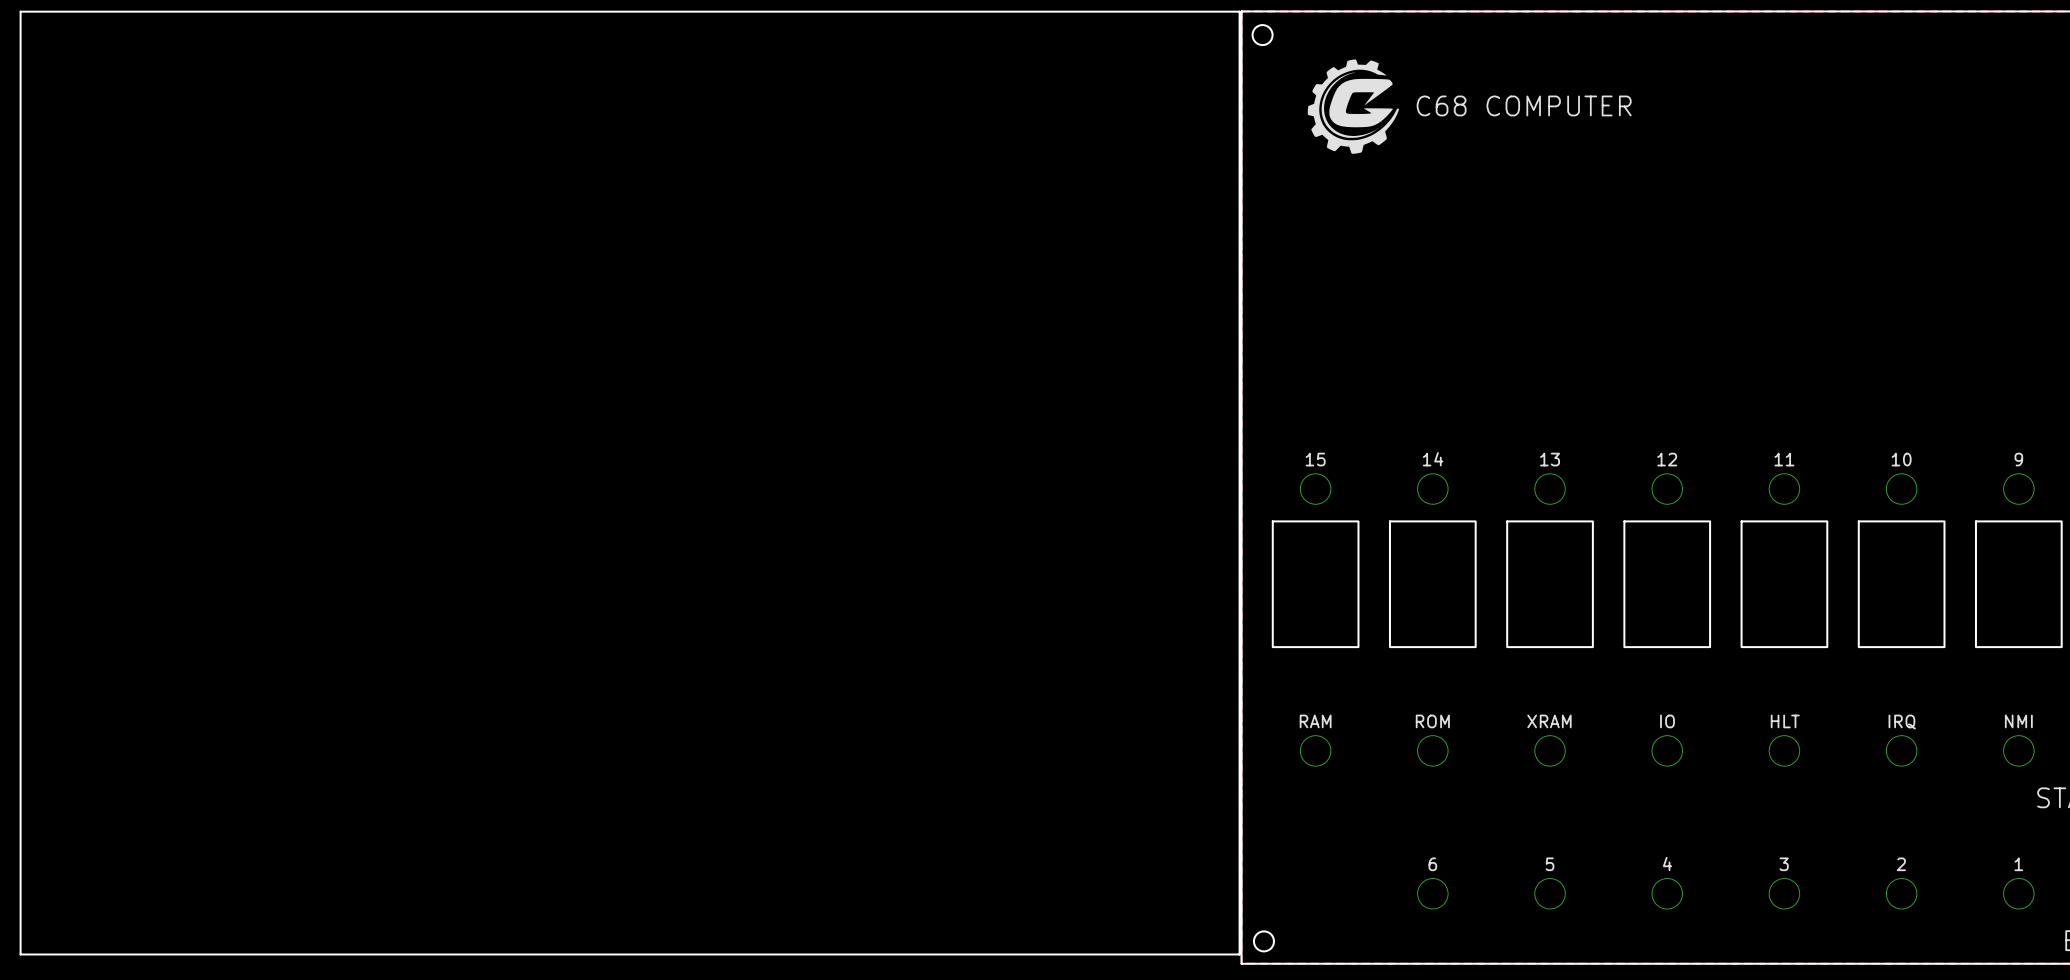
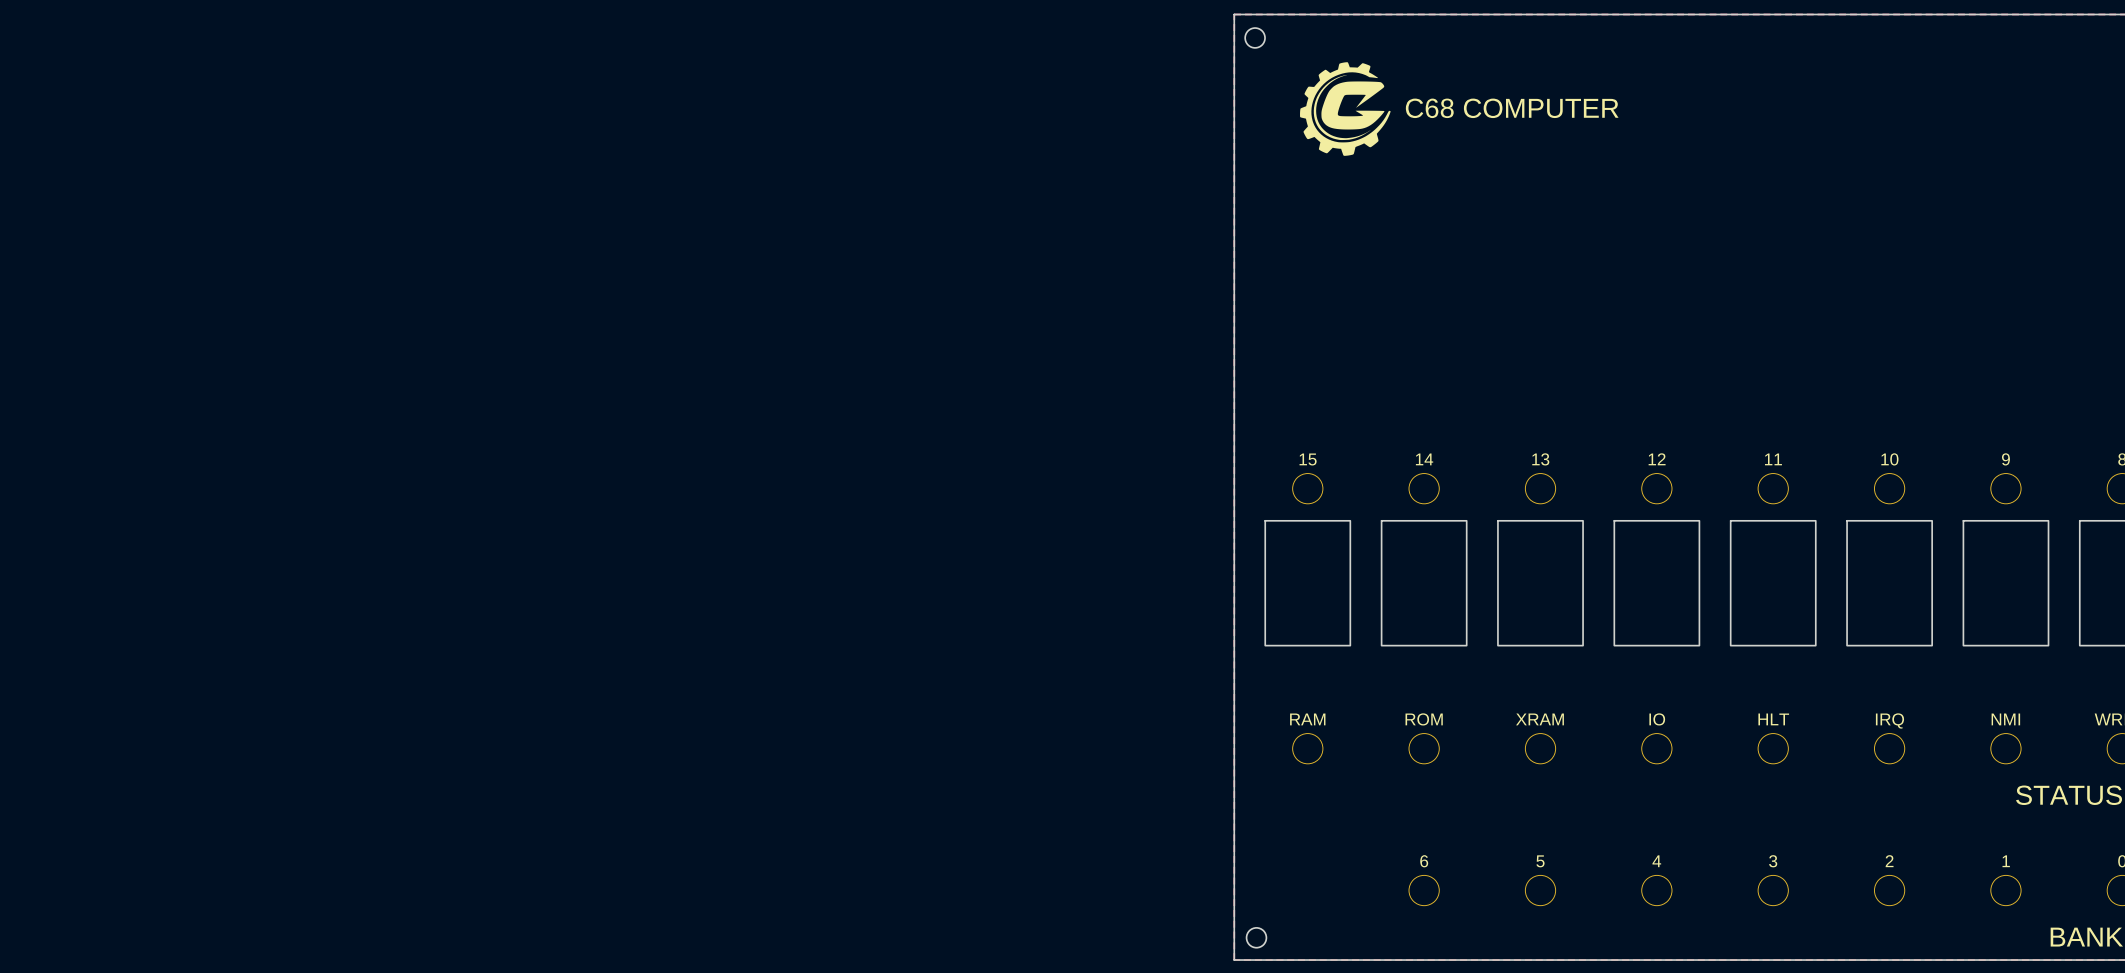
board edge: (20, 11) (1239, 11) (1239, 954) (20, 954) (20, 11) -> none

